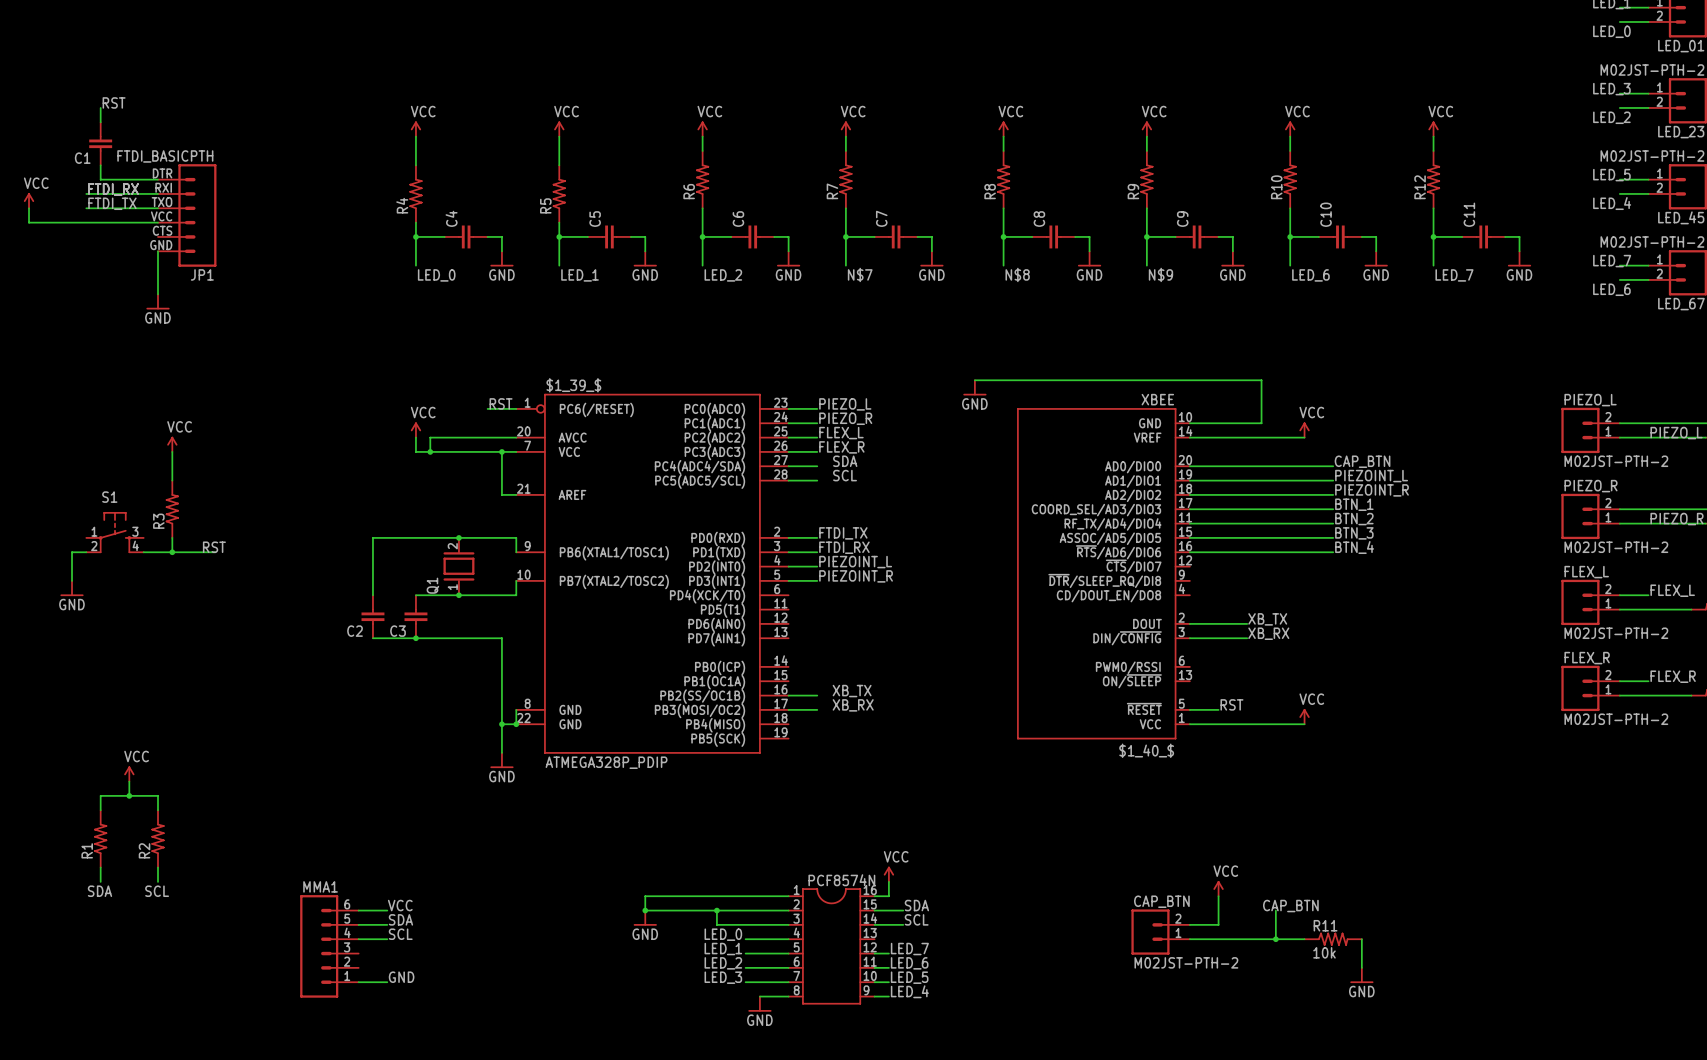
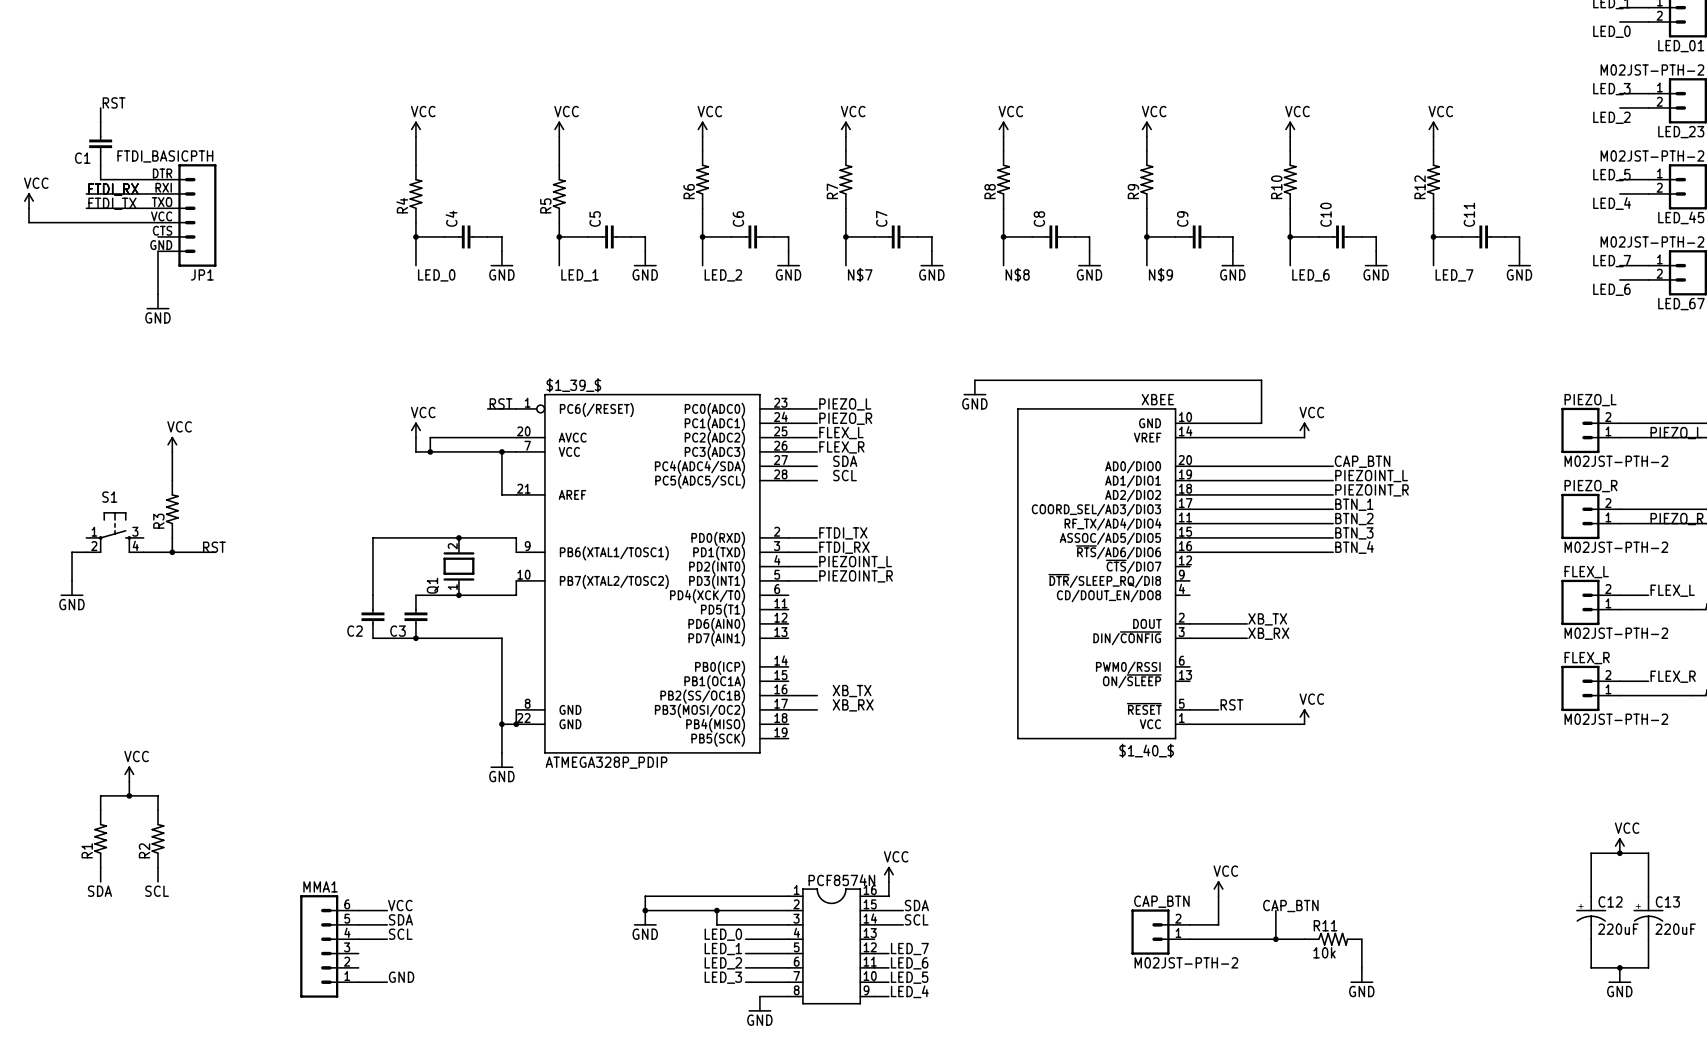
power symbol: none -> VCC (1619, 845)
junction: none -> (1619, 853)
wire: none -> (1591, 896) (1591, 853) (1648, 853) (1648, 896)
C12: none -> 220uF (1591, 917)
C13: none -> 220uF (1648, 917)
wire: none -> (1591, 939) (1591, 967) (1648, 967) (1648, 939)
junction: none -> (1619, 967)
power symbol: none -> GND (1619, 975)

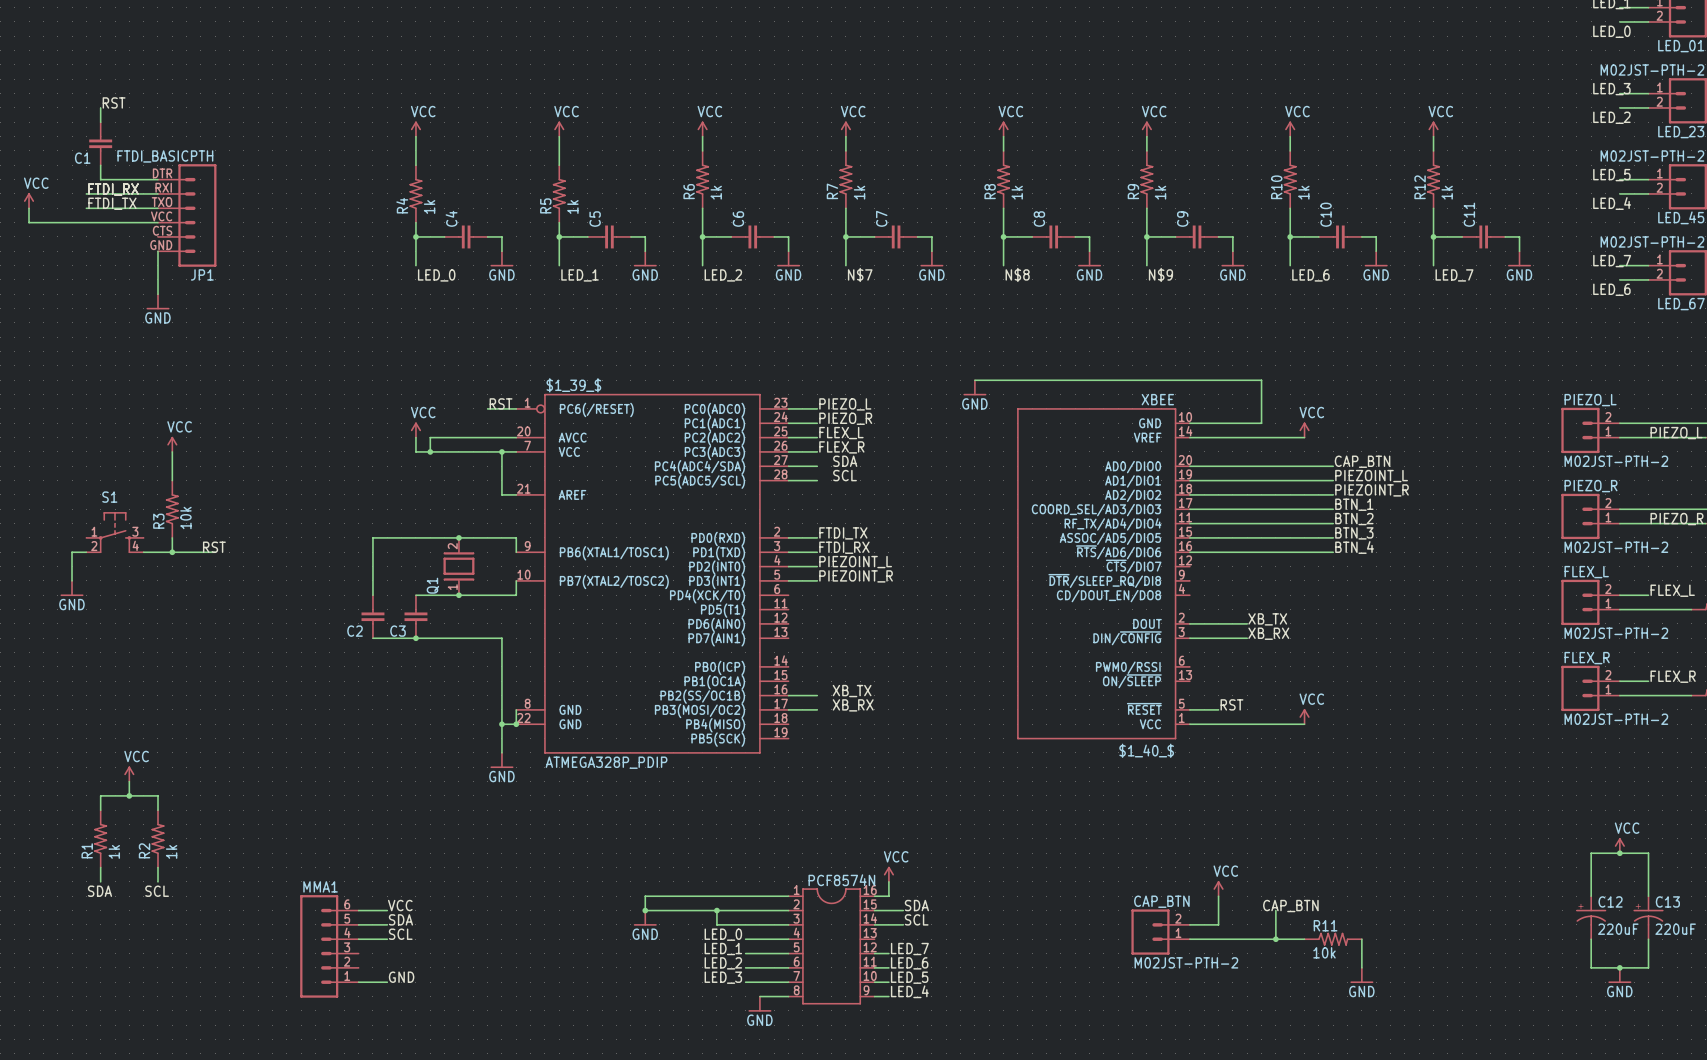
R6 value: none -> 1k (716, 192)
R7 value: none -> 1k (859, 192)
R8 value: none -> 1k (1017, 192)
R9 value: none -> 1k (1160, 192)
R10 value: none -> 1k (1303, 192)
R12 value: none -> 1k (1447, 192)
R4 value: none -> 1k (429, 206)
R5 value: none -> 1k (572, 206)
R3 value: none -> 10k (185, 517)
R1 value: none -> 1k (114, 851)
R2 value: none -> 1k (171, 851)

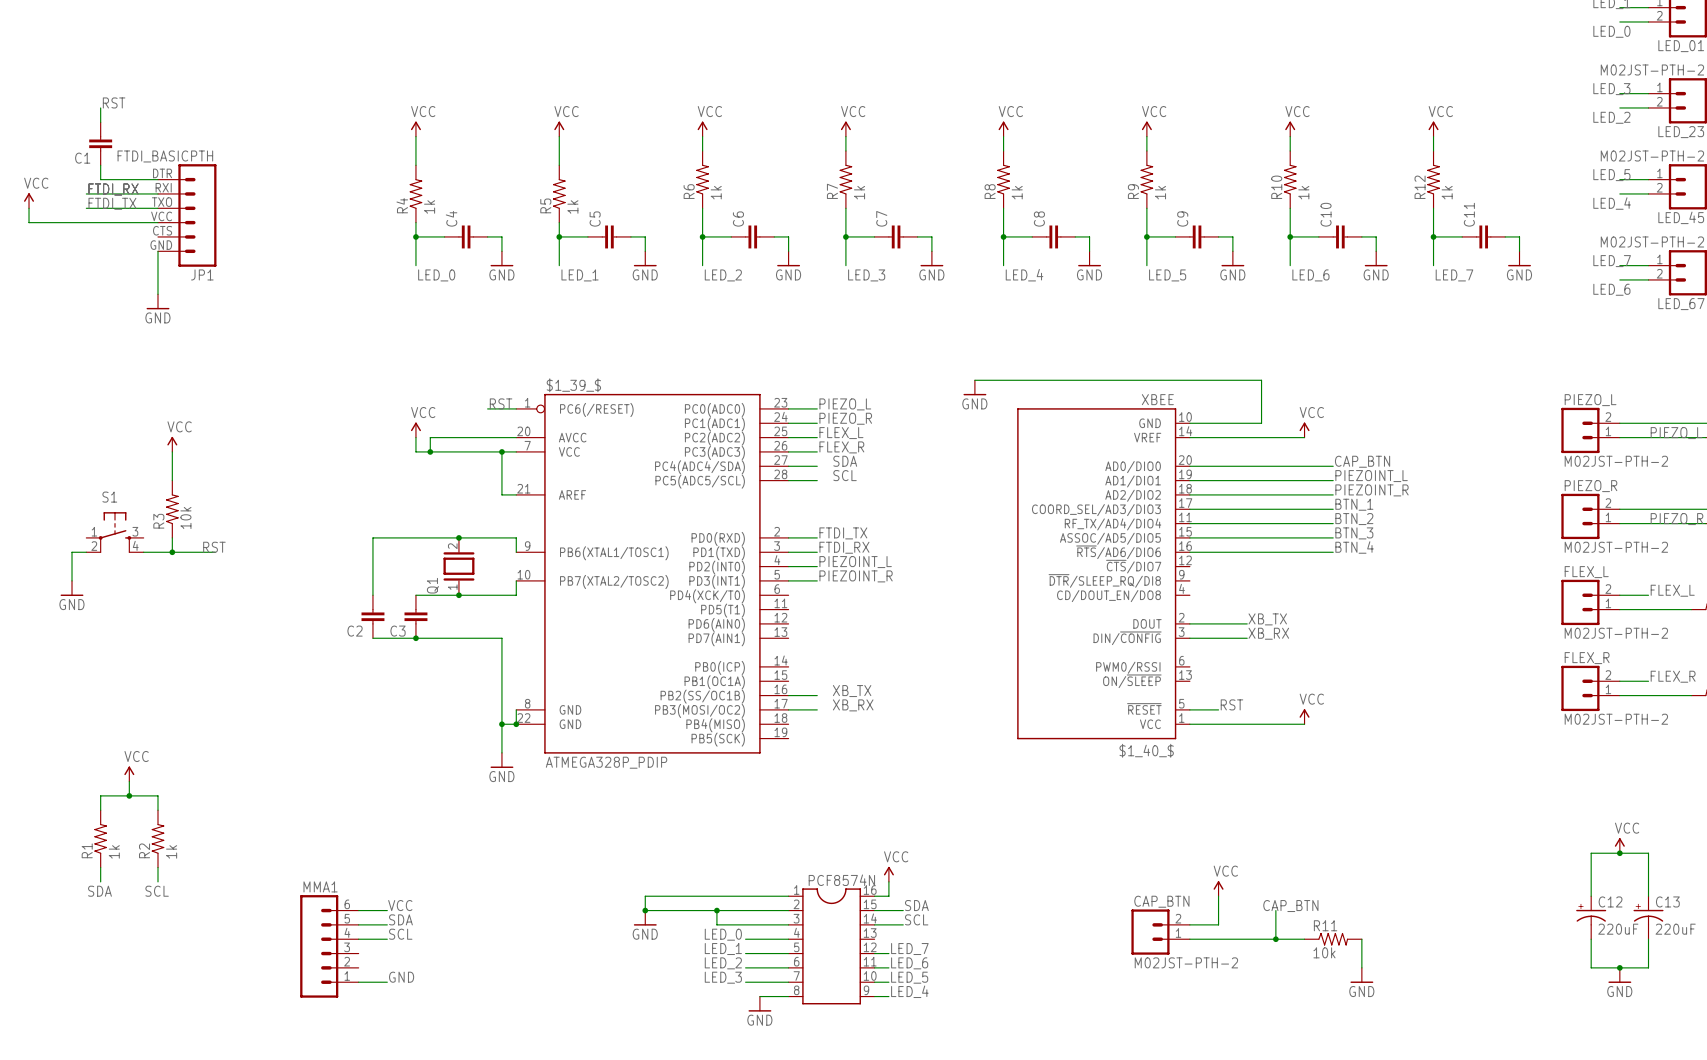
label: N$7 (860, 274) -> LED_3 (866, 275)
label: N$8 (1017, 274) -> LED_4 (1024, 275)
label: N$9 (1160, 274) -> LED_5 (1167, 275)

